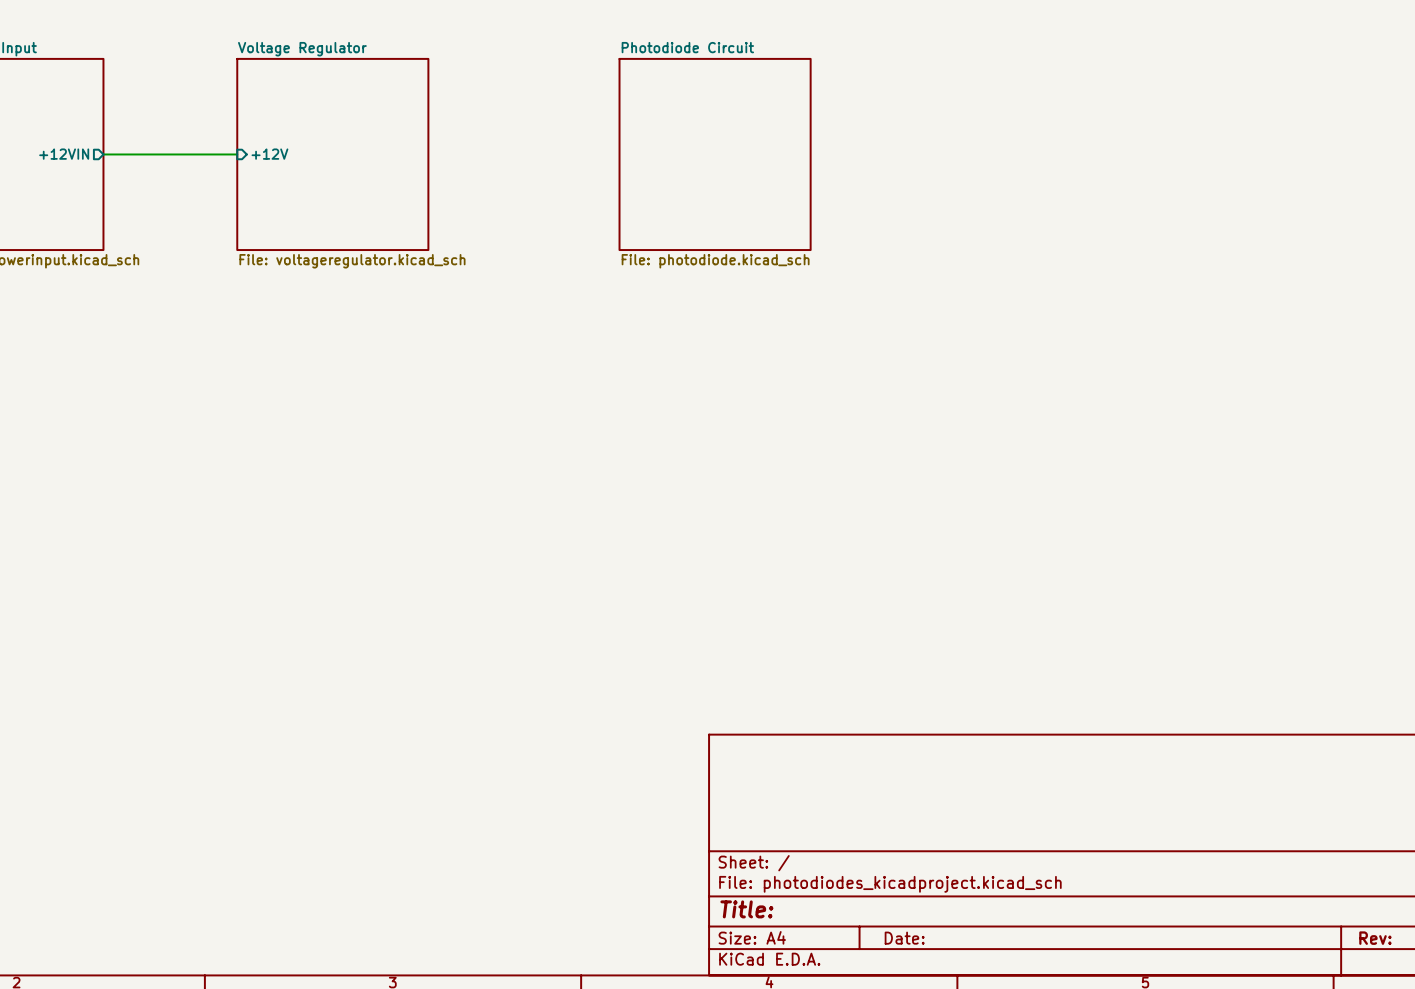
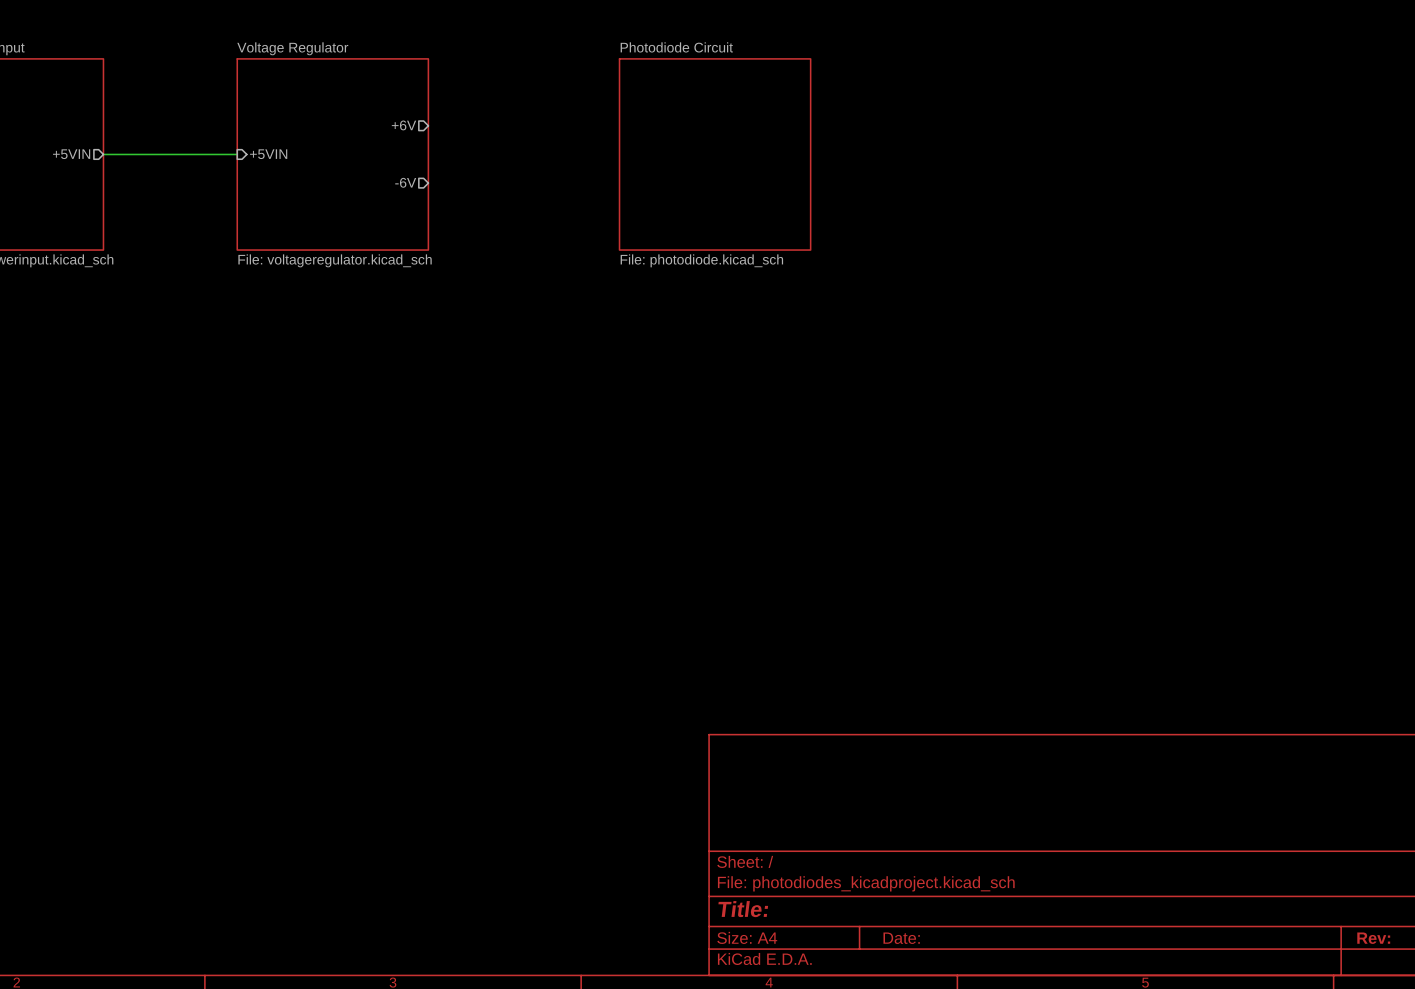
sheet pin: none -> +6V (404, 125)
sheet pin: +12VIN (64, 154) -> +5VIN (71, 154)
sheet pin: +12V (269, 154) -> +5VIN (268, 154)
sheet pin: none -> -6V (405, 182)

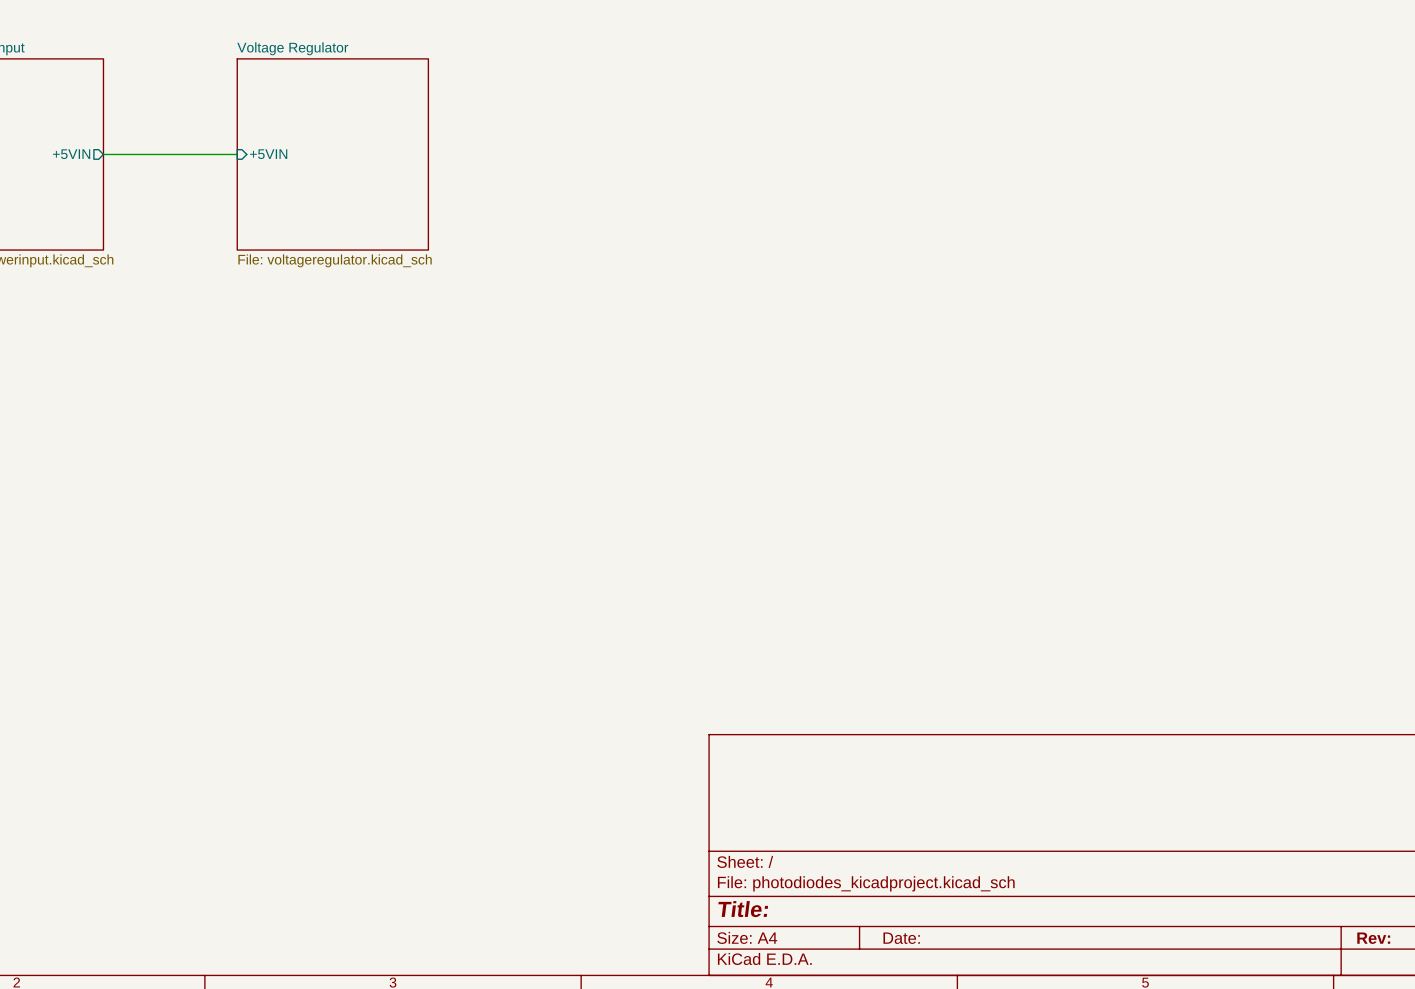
sheet pin: +6V (404, 125) -> none
sheet Photodiode Circuit: File: photodiode.kicad_sch (715, 154) -> none
sheet pin: -6V (405, 182) -> none

